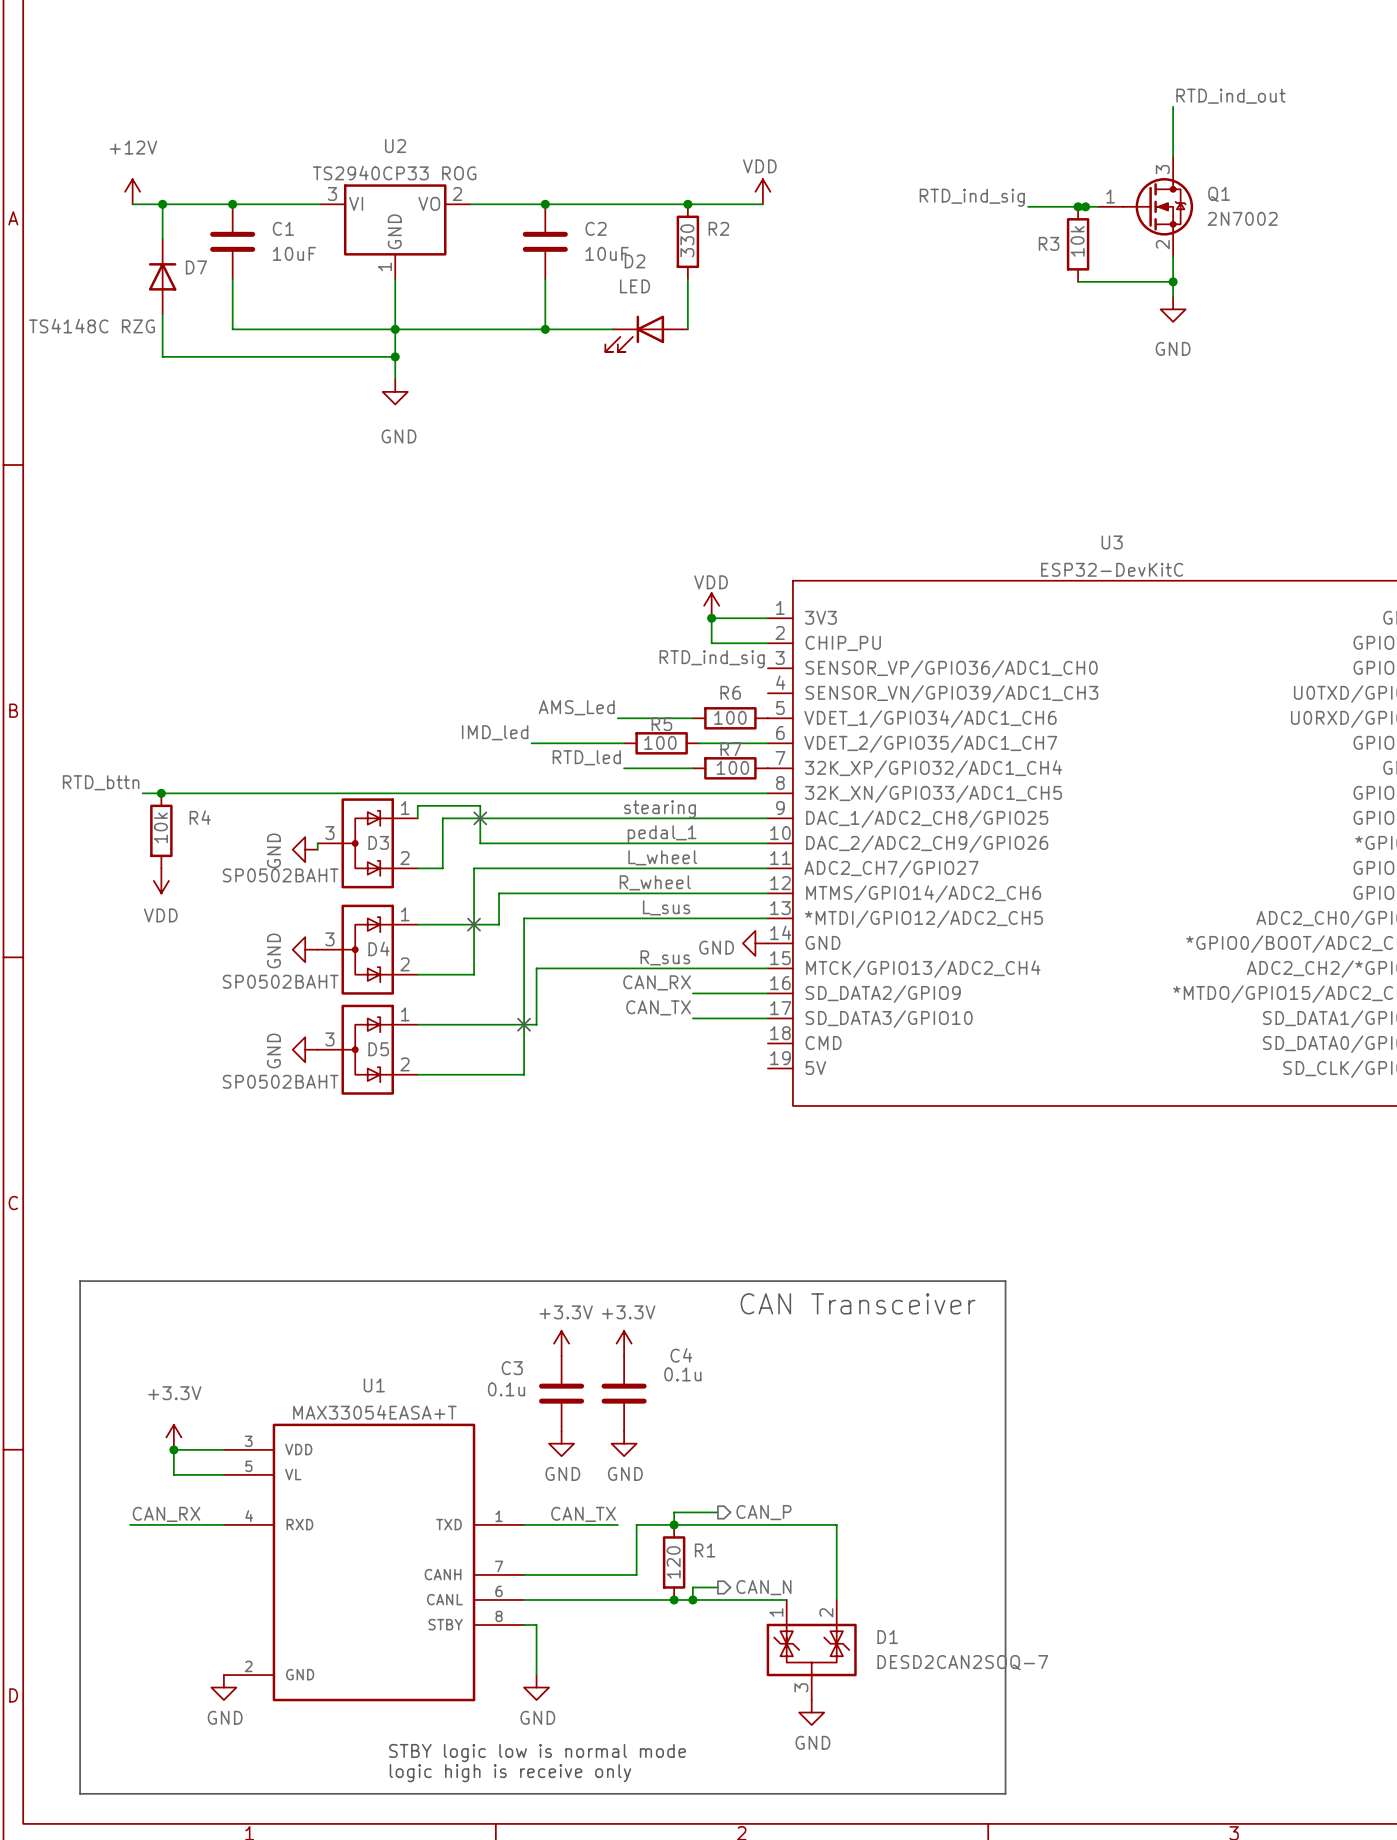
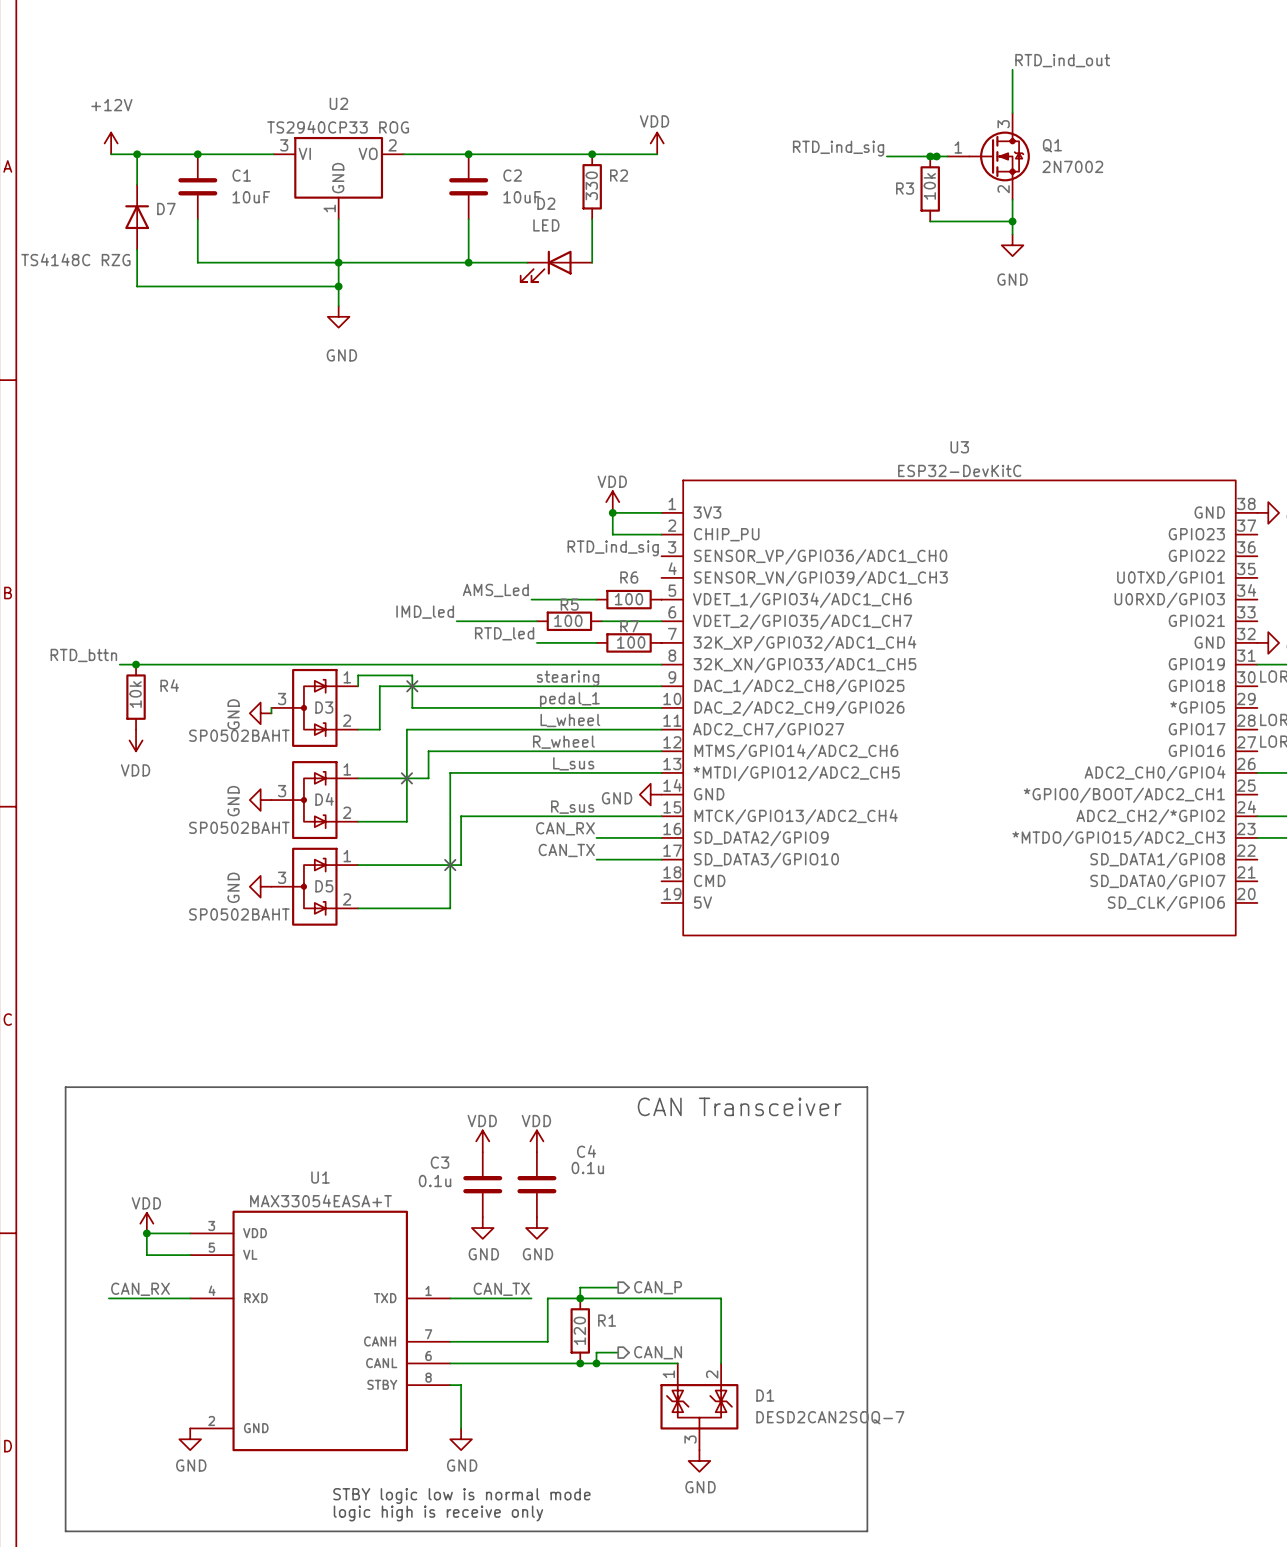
power symbol: +3.3V (561, 1343) -> VDD (482, 1141)
power symbol: +3.3V (624, 1343) -> VDD (536, 1141)
power symbol: +3.3V (173, 1437) -> VDD (146, 1223)

